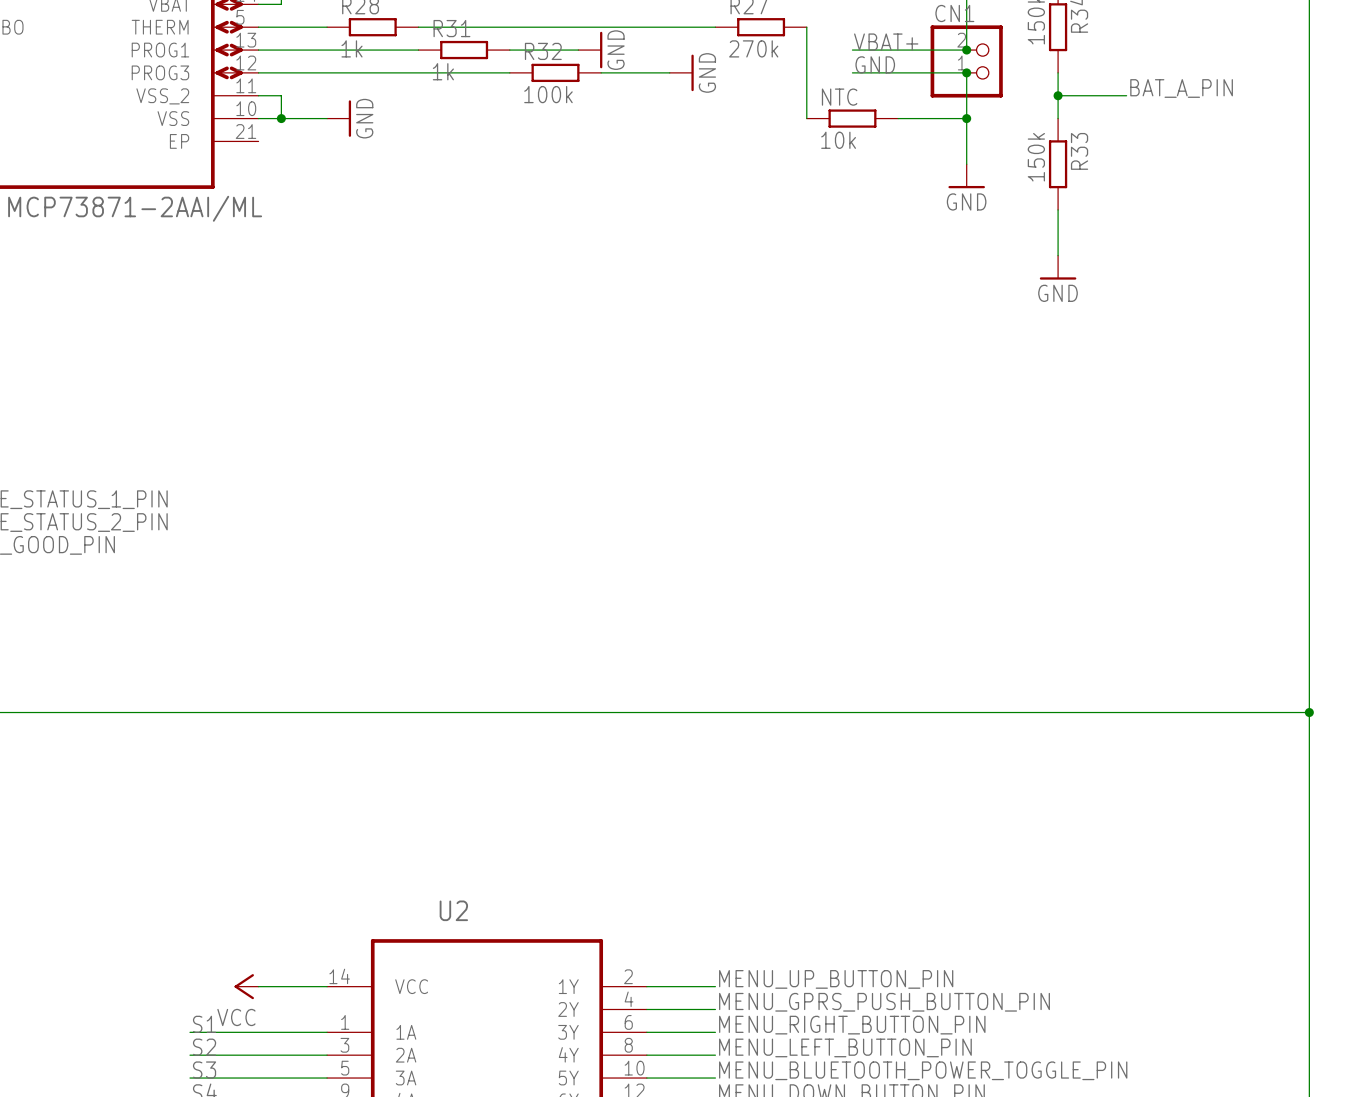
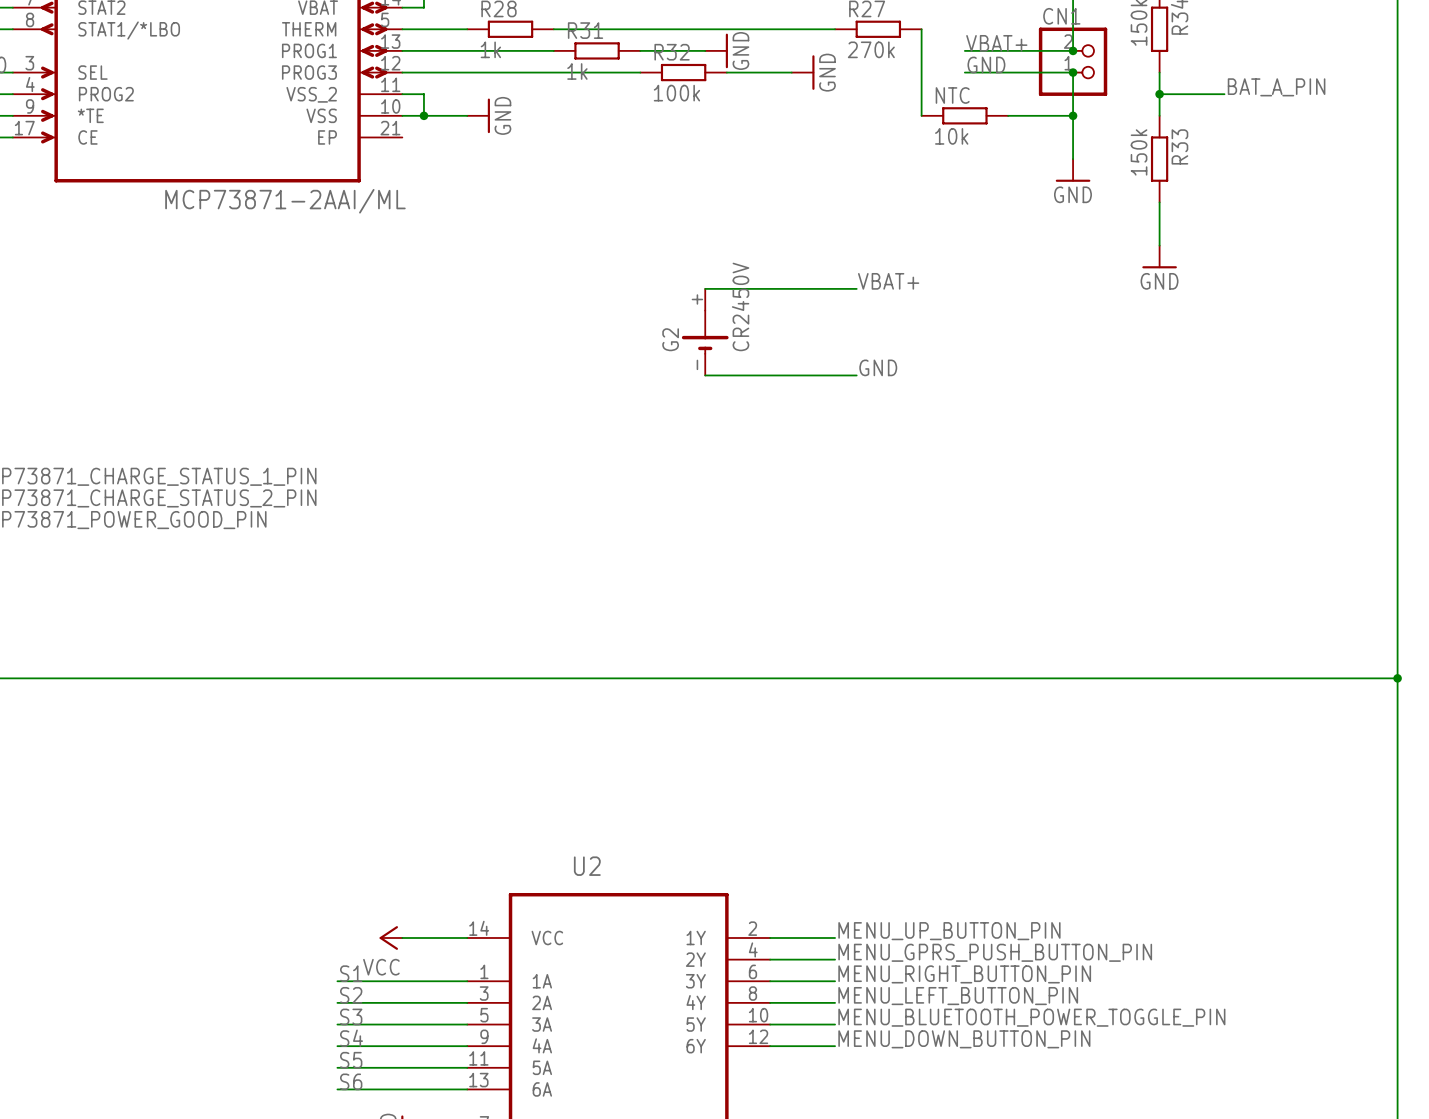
label: none -> VBAT+ (888, 281)
wire: none -> (705, 288) (856, 288)
G2: none -> CR2450V (705, 332)
label: none -> GND (878, 367)
wire: none -> (705, 375) (856, 375)

